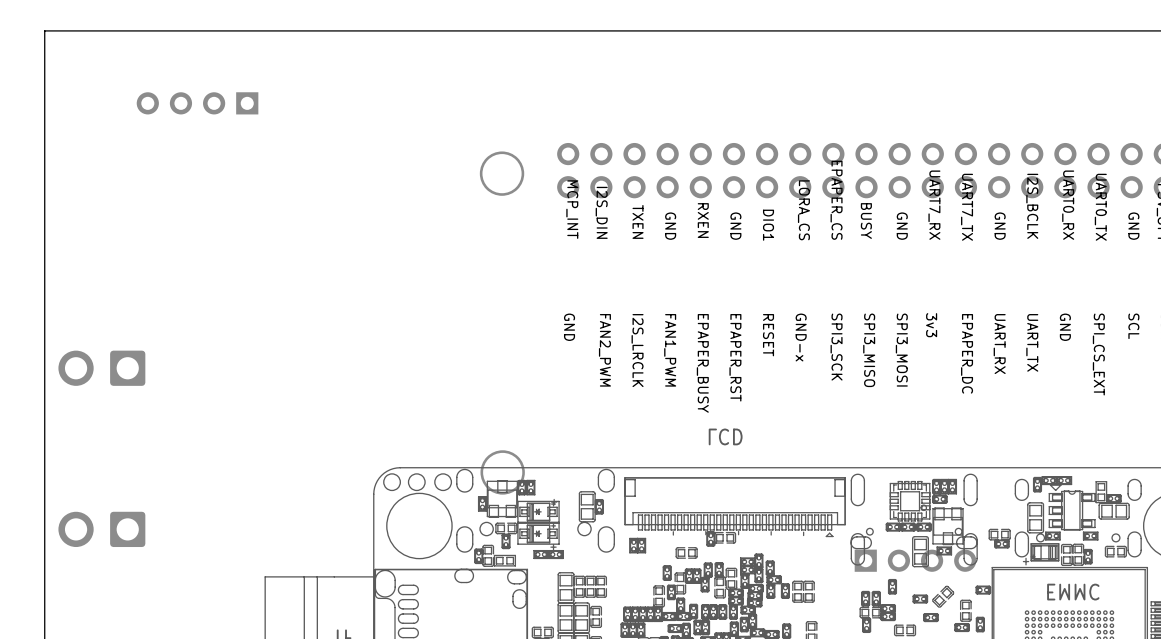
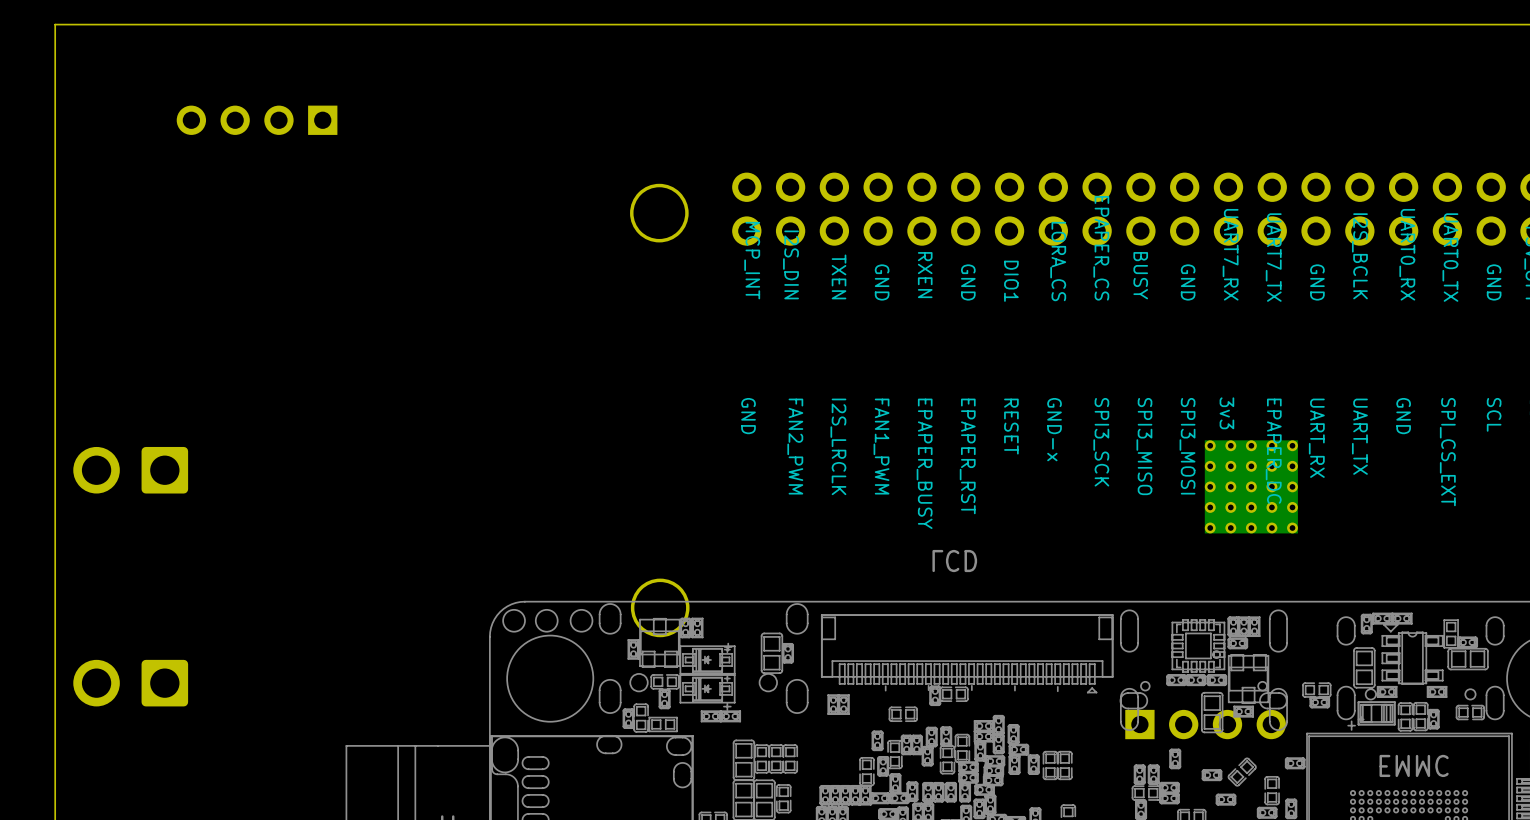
part: none -> (1251, 486)

